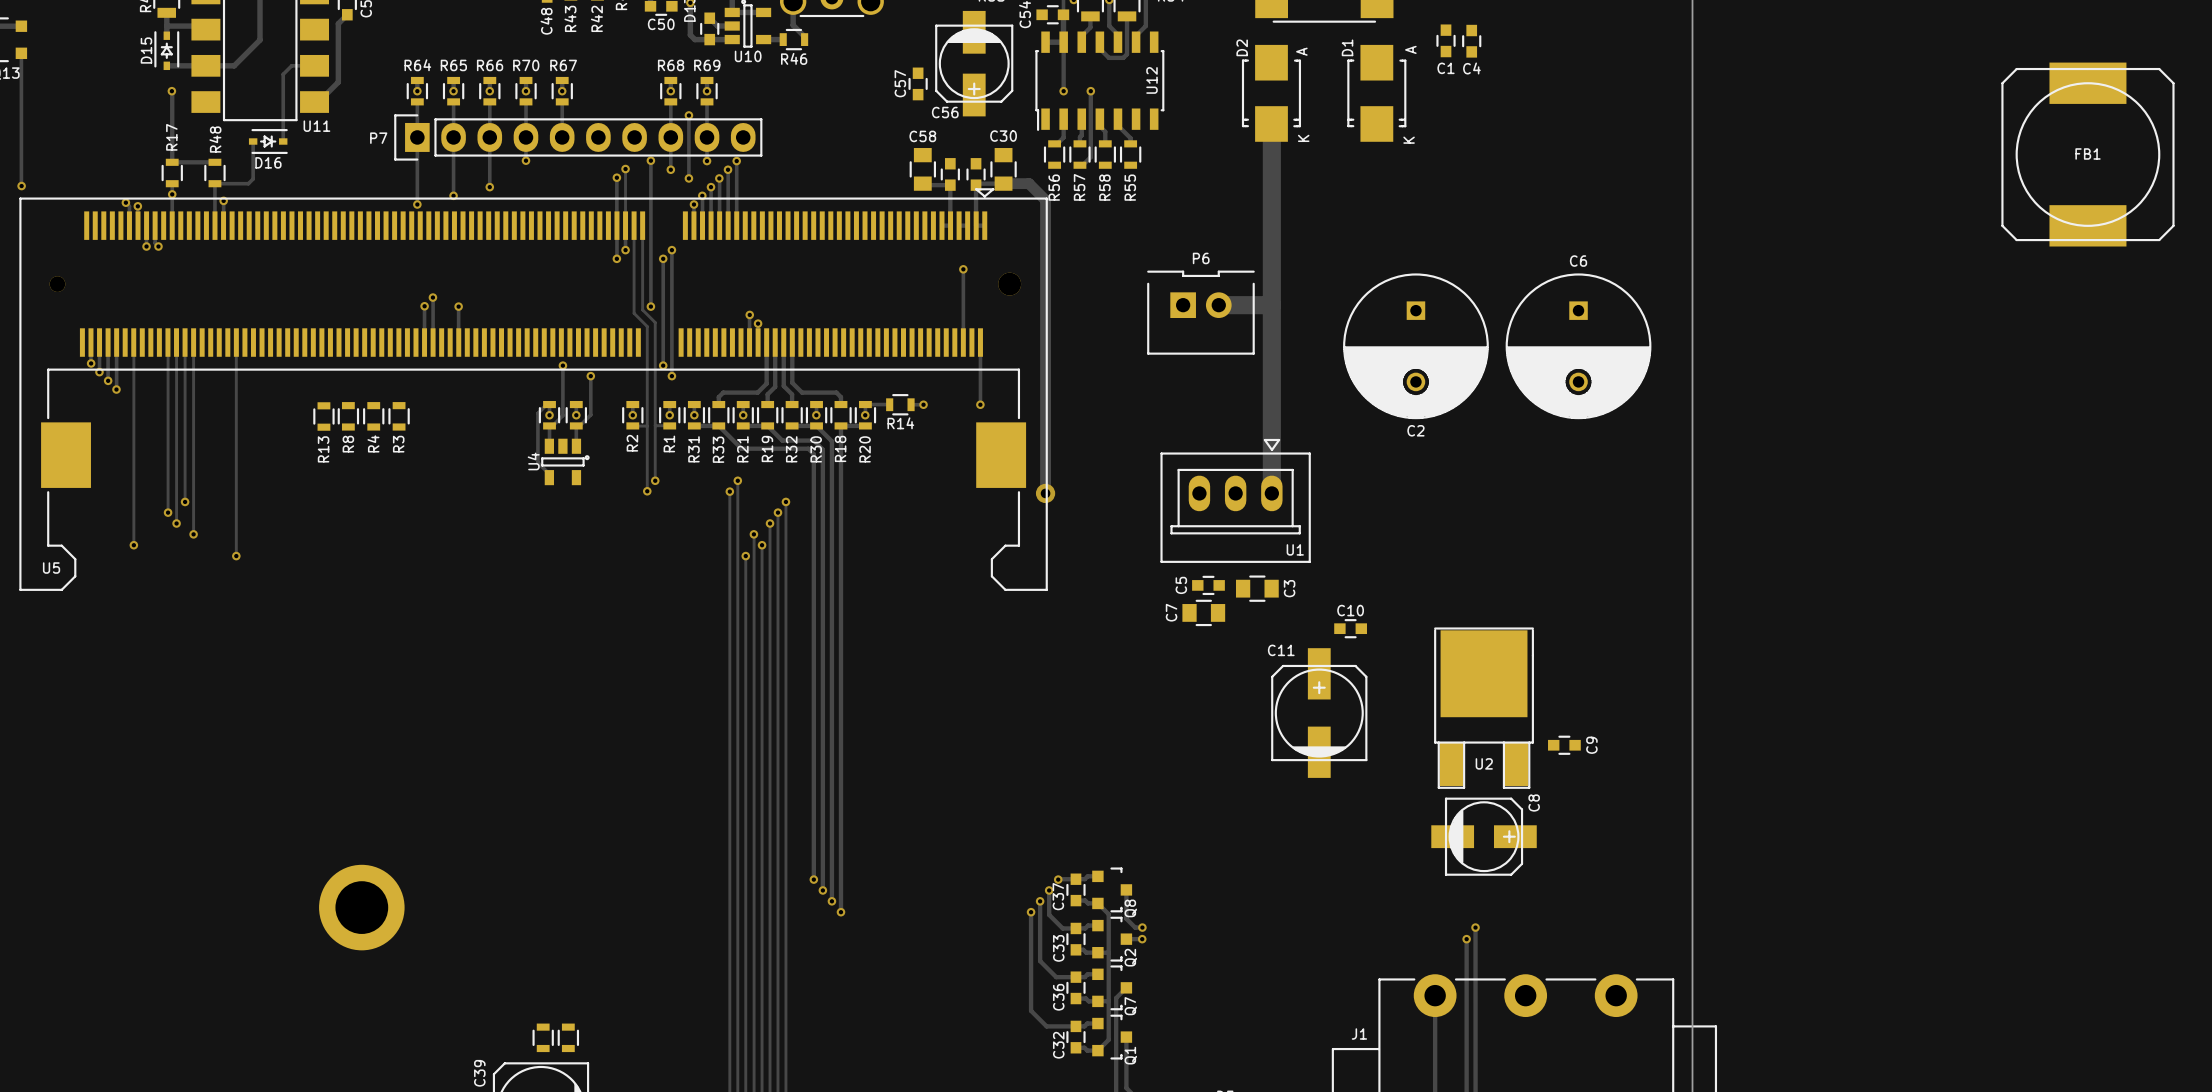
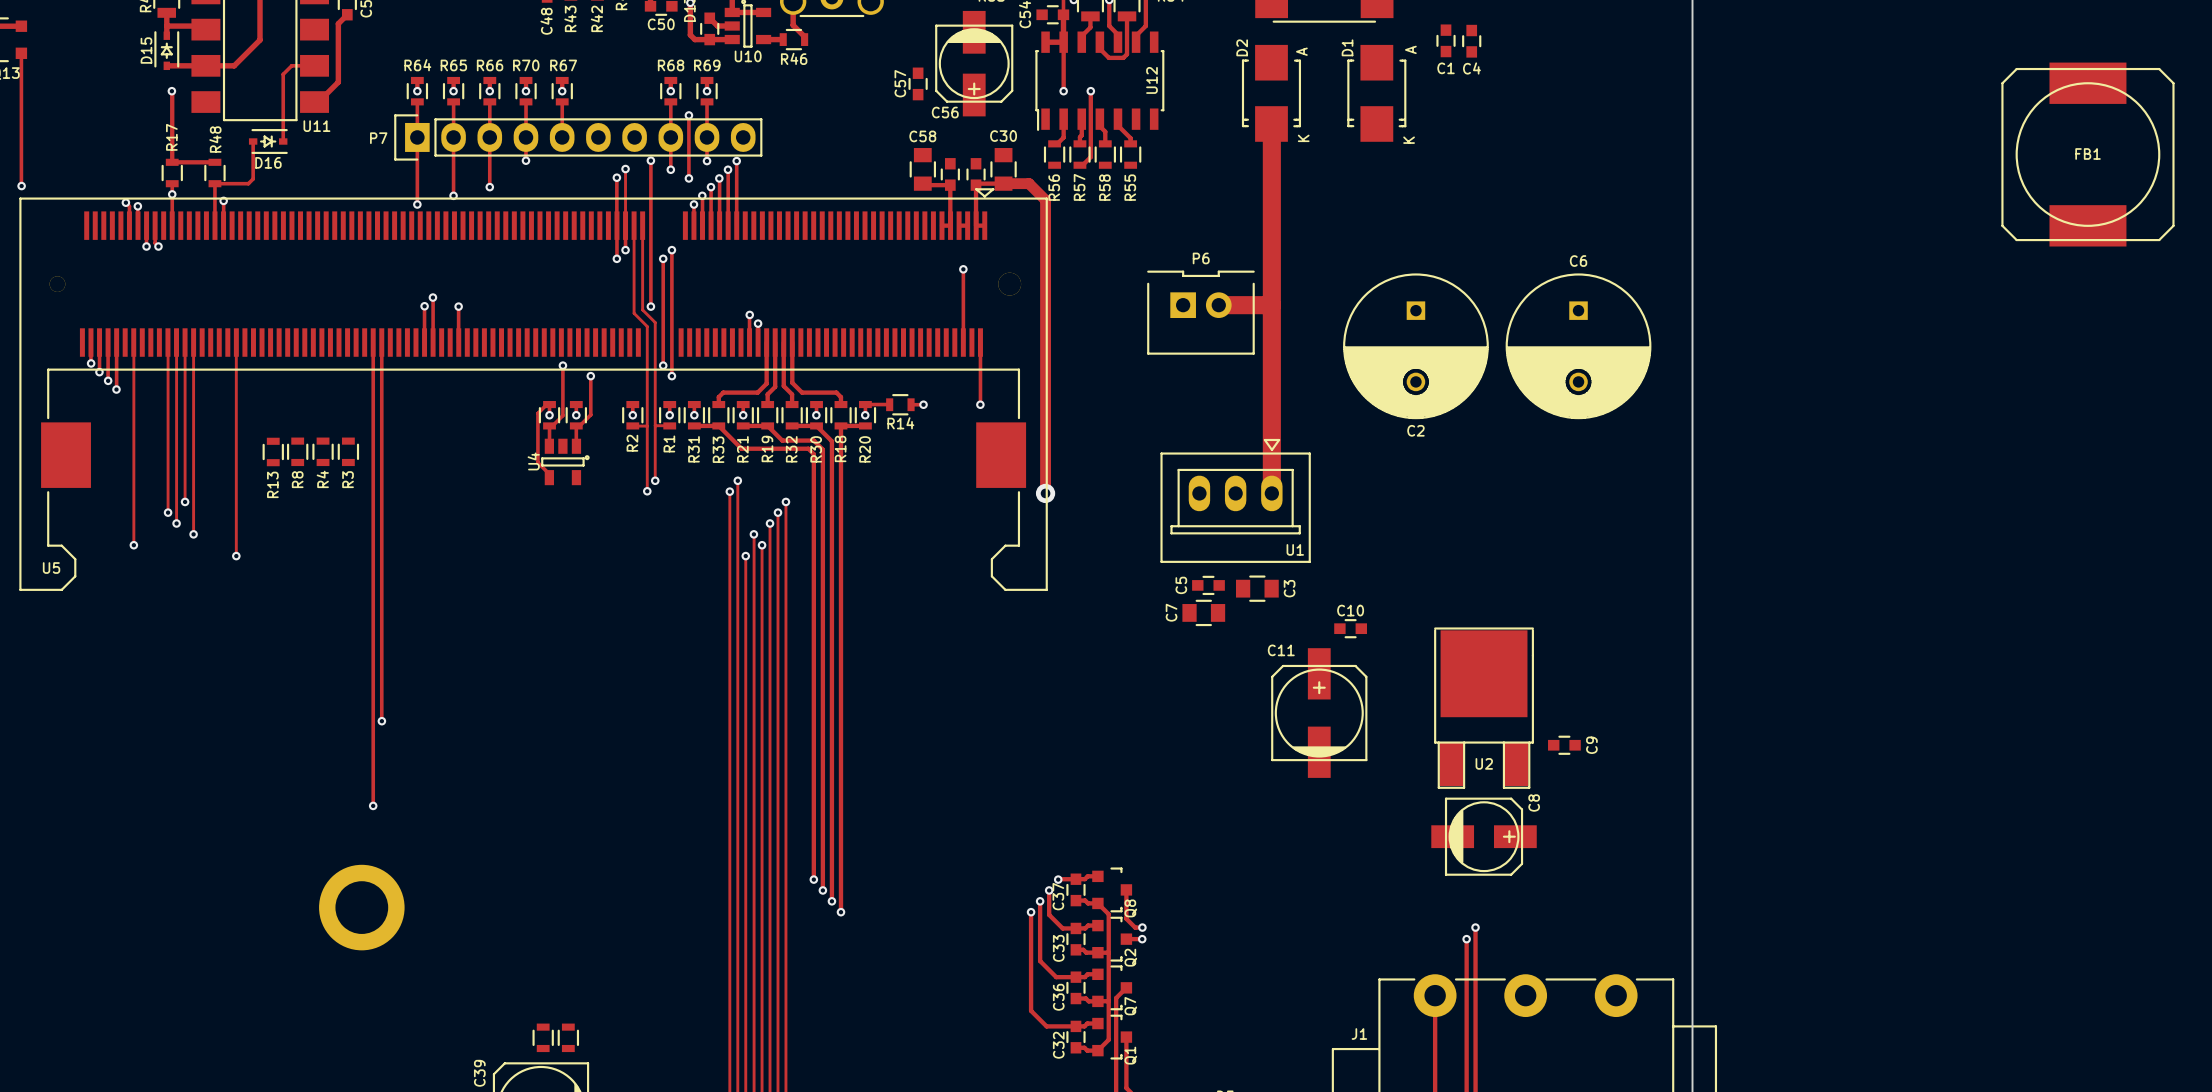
track: none -> (373, 342) (373, 805)
track: none -> (381, 342) (381, 721)
R13 position: (323, 416) -> (273, 451)
R8 position: (348, 416) -> (297, 451)
R4 position: (373, 416) -> (323, 451)
R3 position: (399, 416) -> (348, 451)
via: none -> (381, 721)
via: none -> (373, 805)

